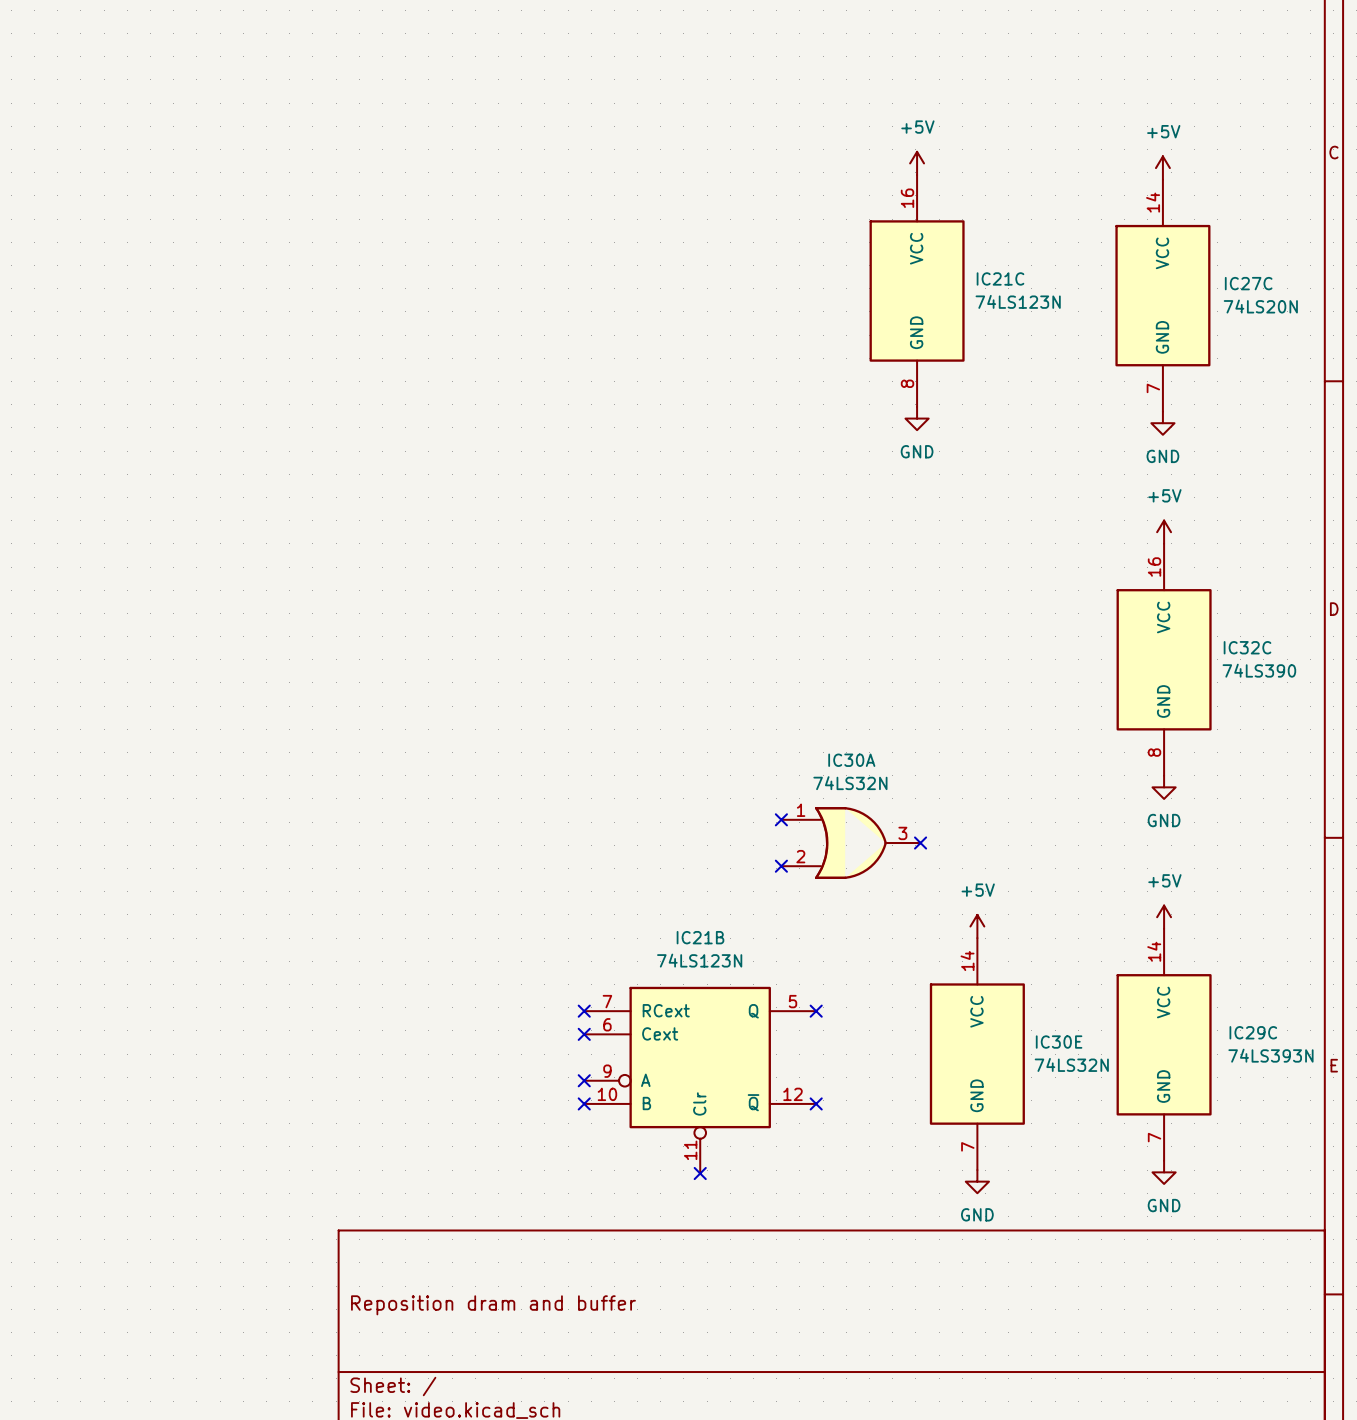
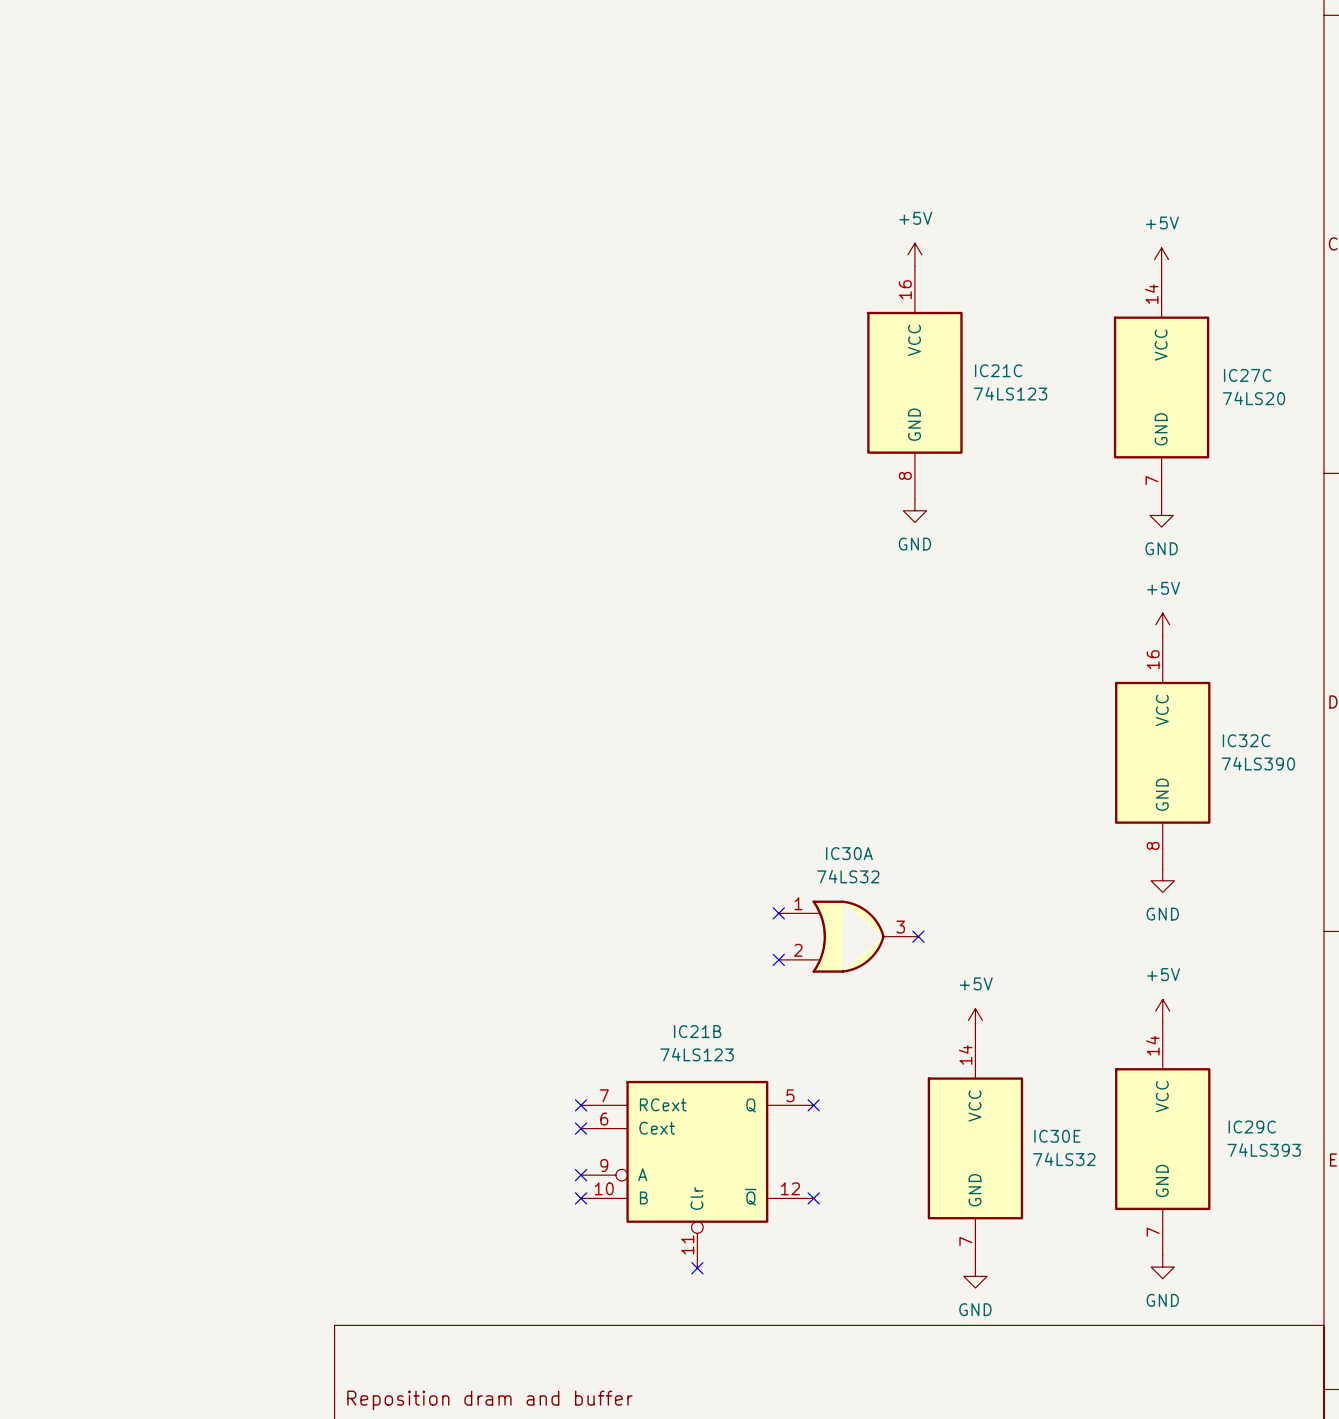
IC21C value: 74LS123N (1018, 301) -> 74LS123 (1010, 393)
IC27C value: 74LS20N (1260, 306) -> 74LS20 (1253, 398)
IC30A value: 74LS32N (850, 783) -> 74LS32 (848, 876)
IC21B value: 74LS123N (699, 960) -> 74LS123 (697, 1054)
IC29C value: 74LS393N (1270, 1055) -> 74LS393 (1264, 1150)
IC30E value: 74LS32N (1071, 1064) -> 74LS32 (1064, 1159)

